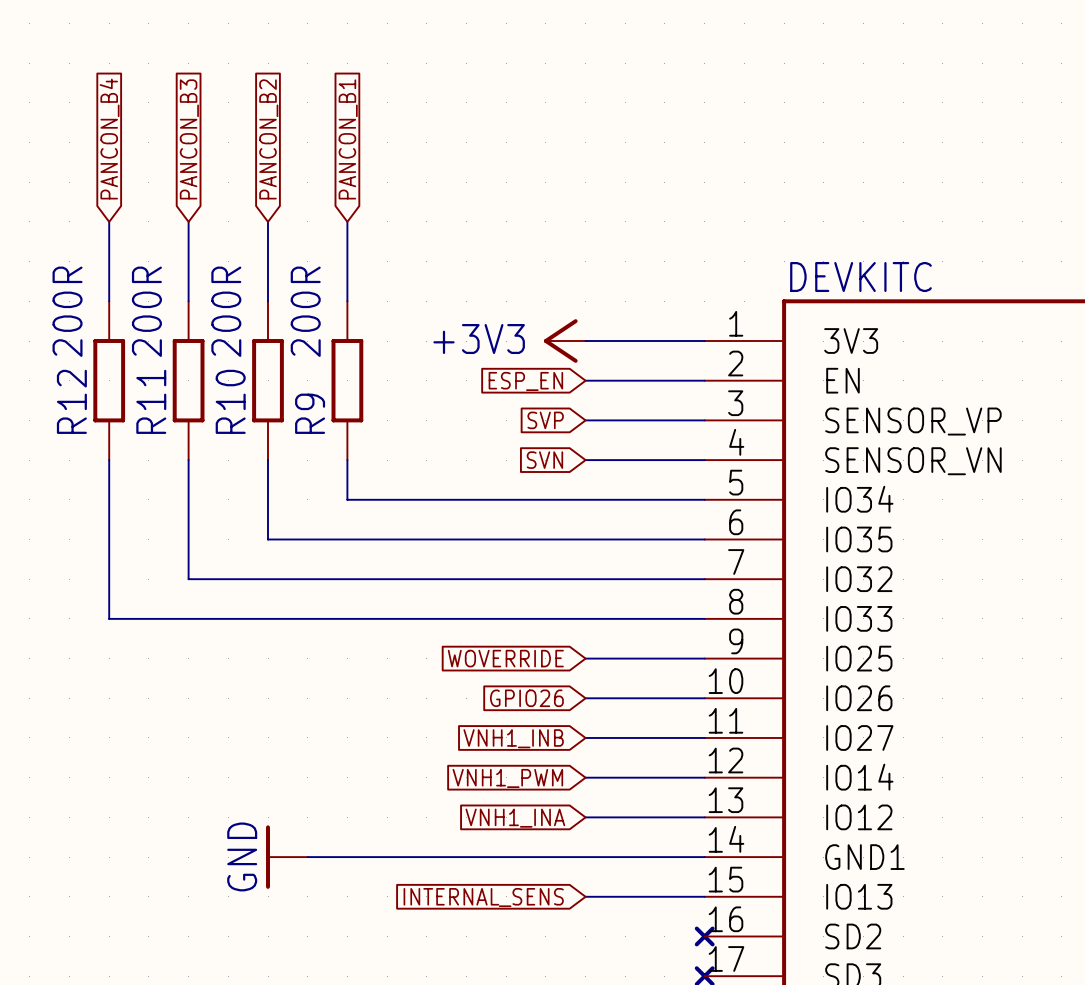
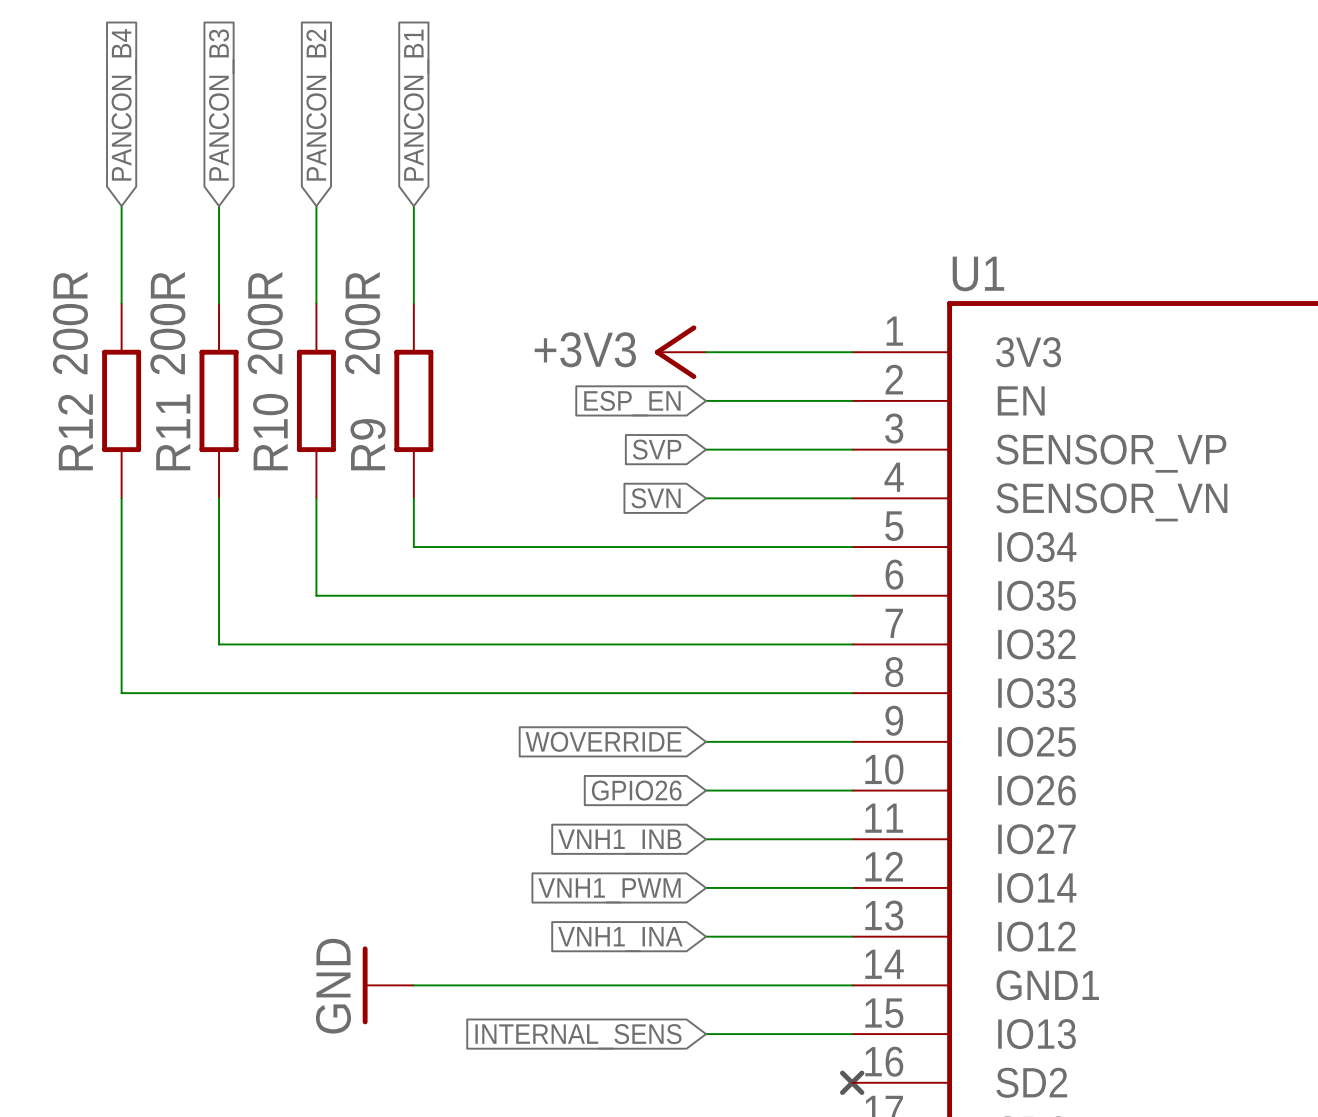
DEVKITC name: DEVKITC (860, 277) -> U1 (978, 273)
power symbol position: GND (286, 857) -> GND (388, 985)

